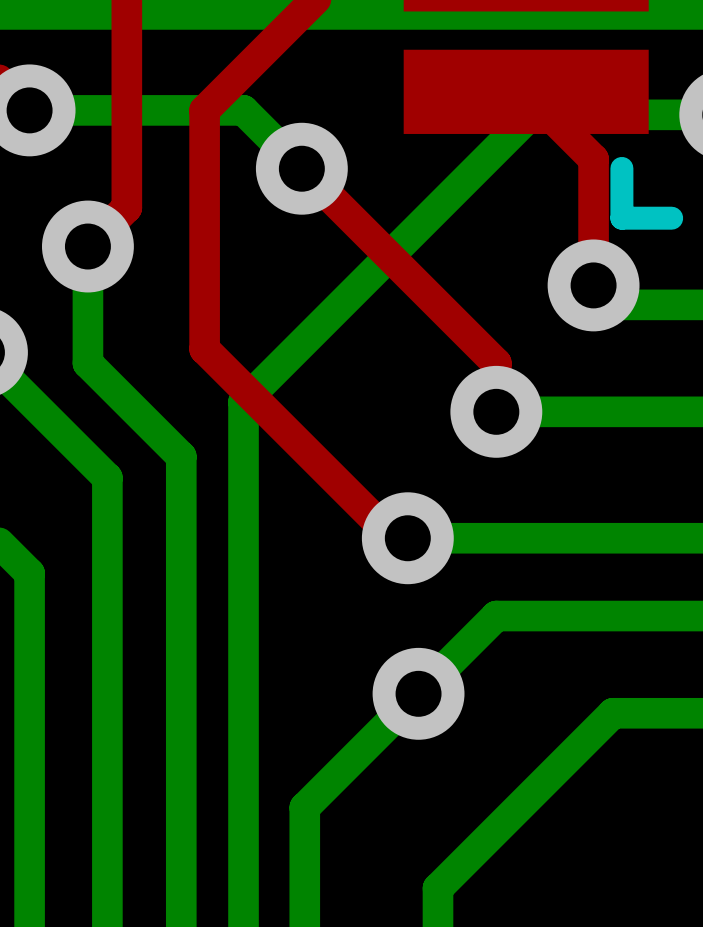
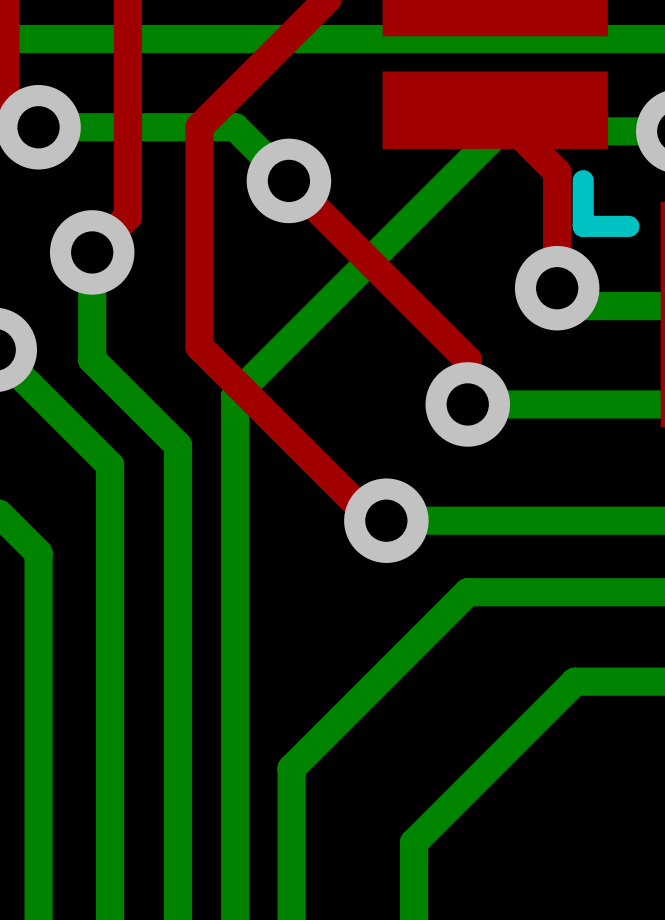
via: (418, 693) -> none

